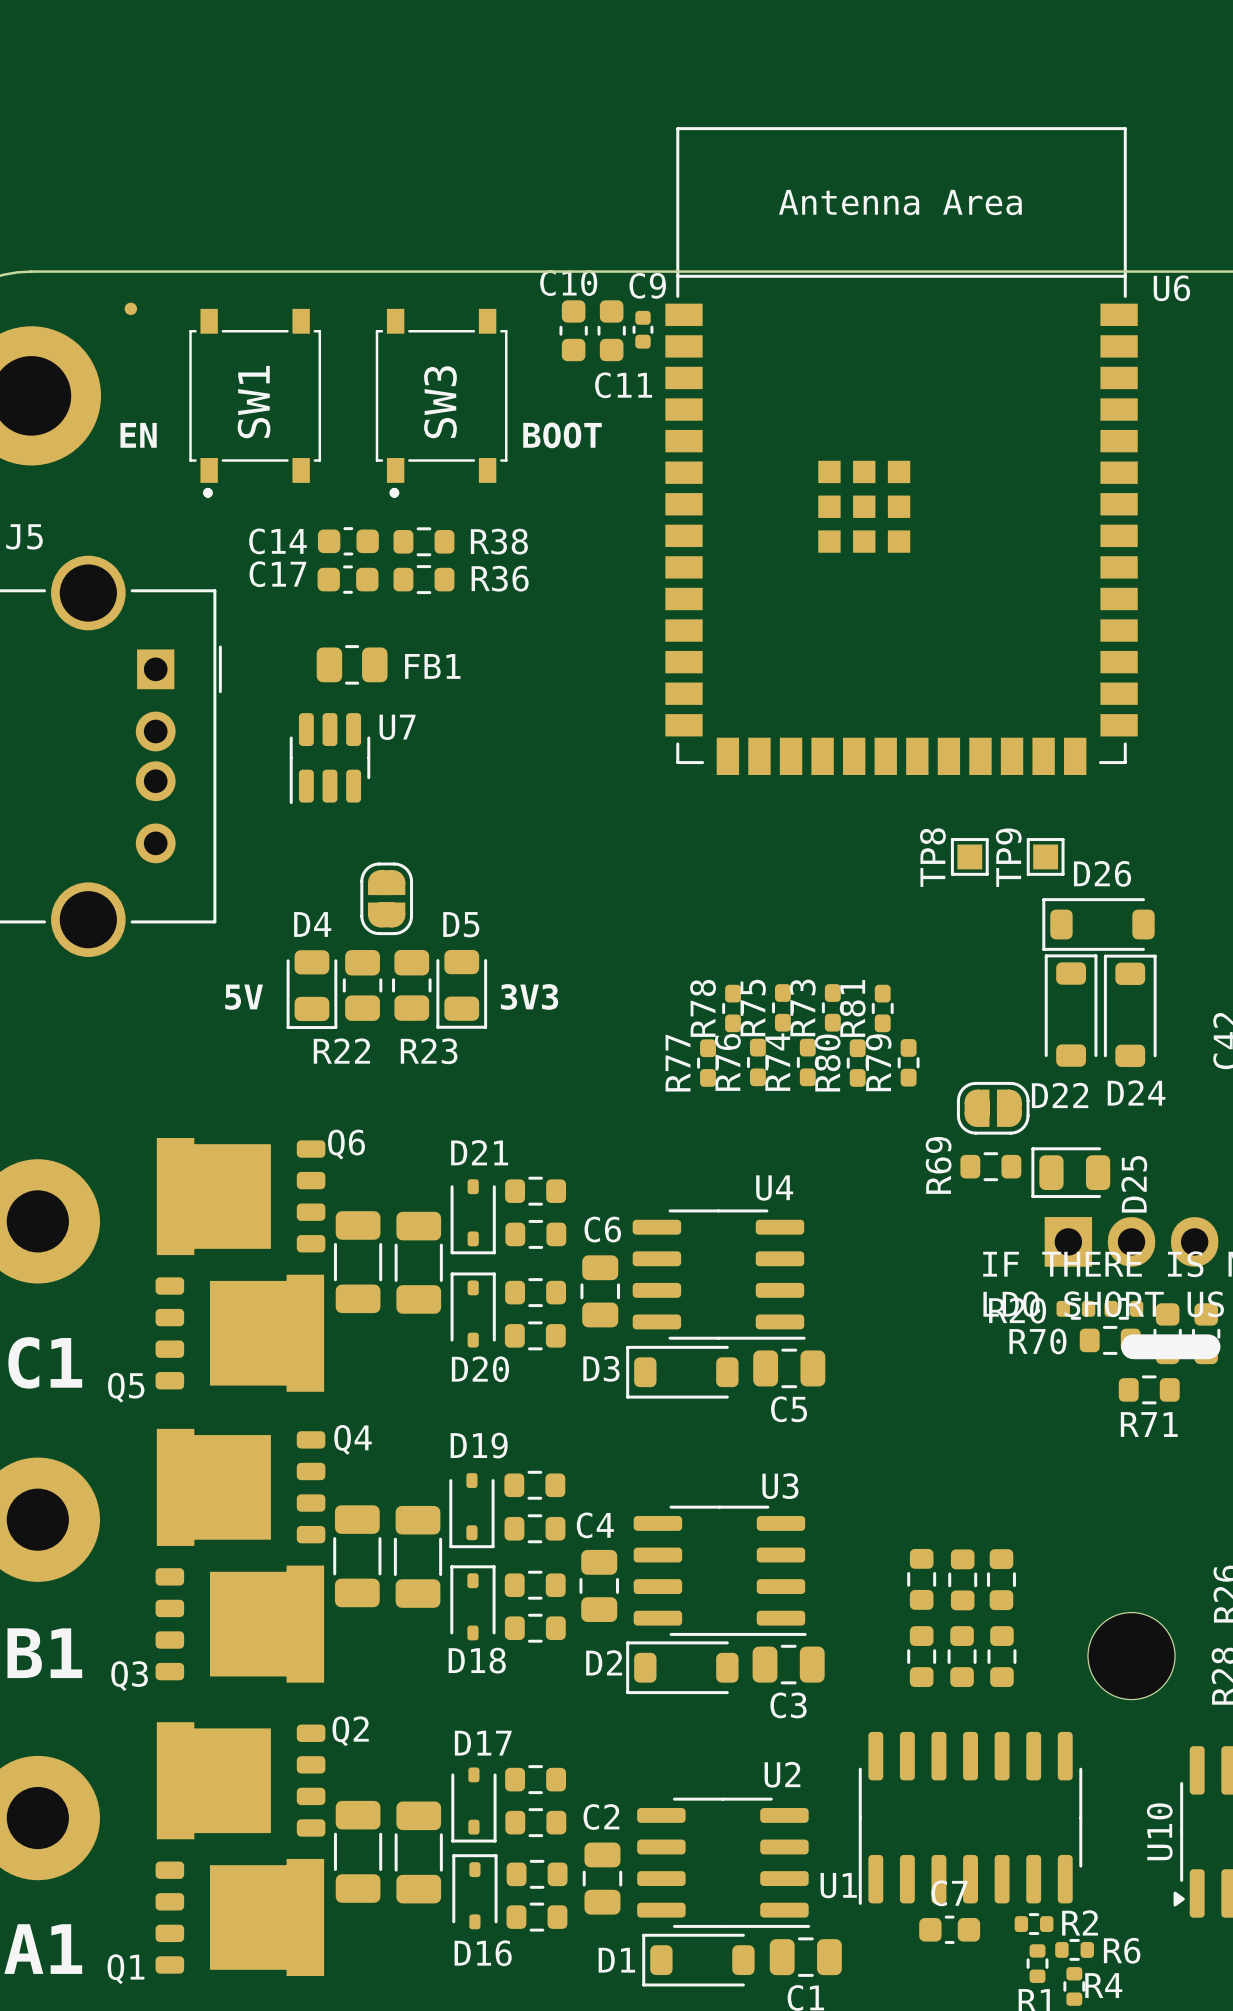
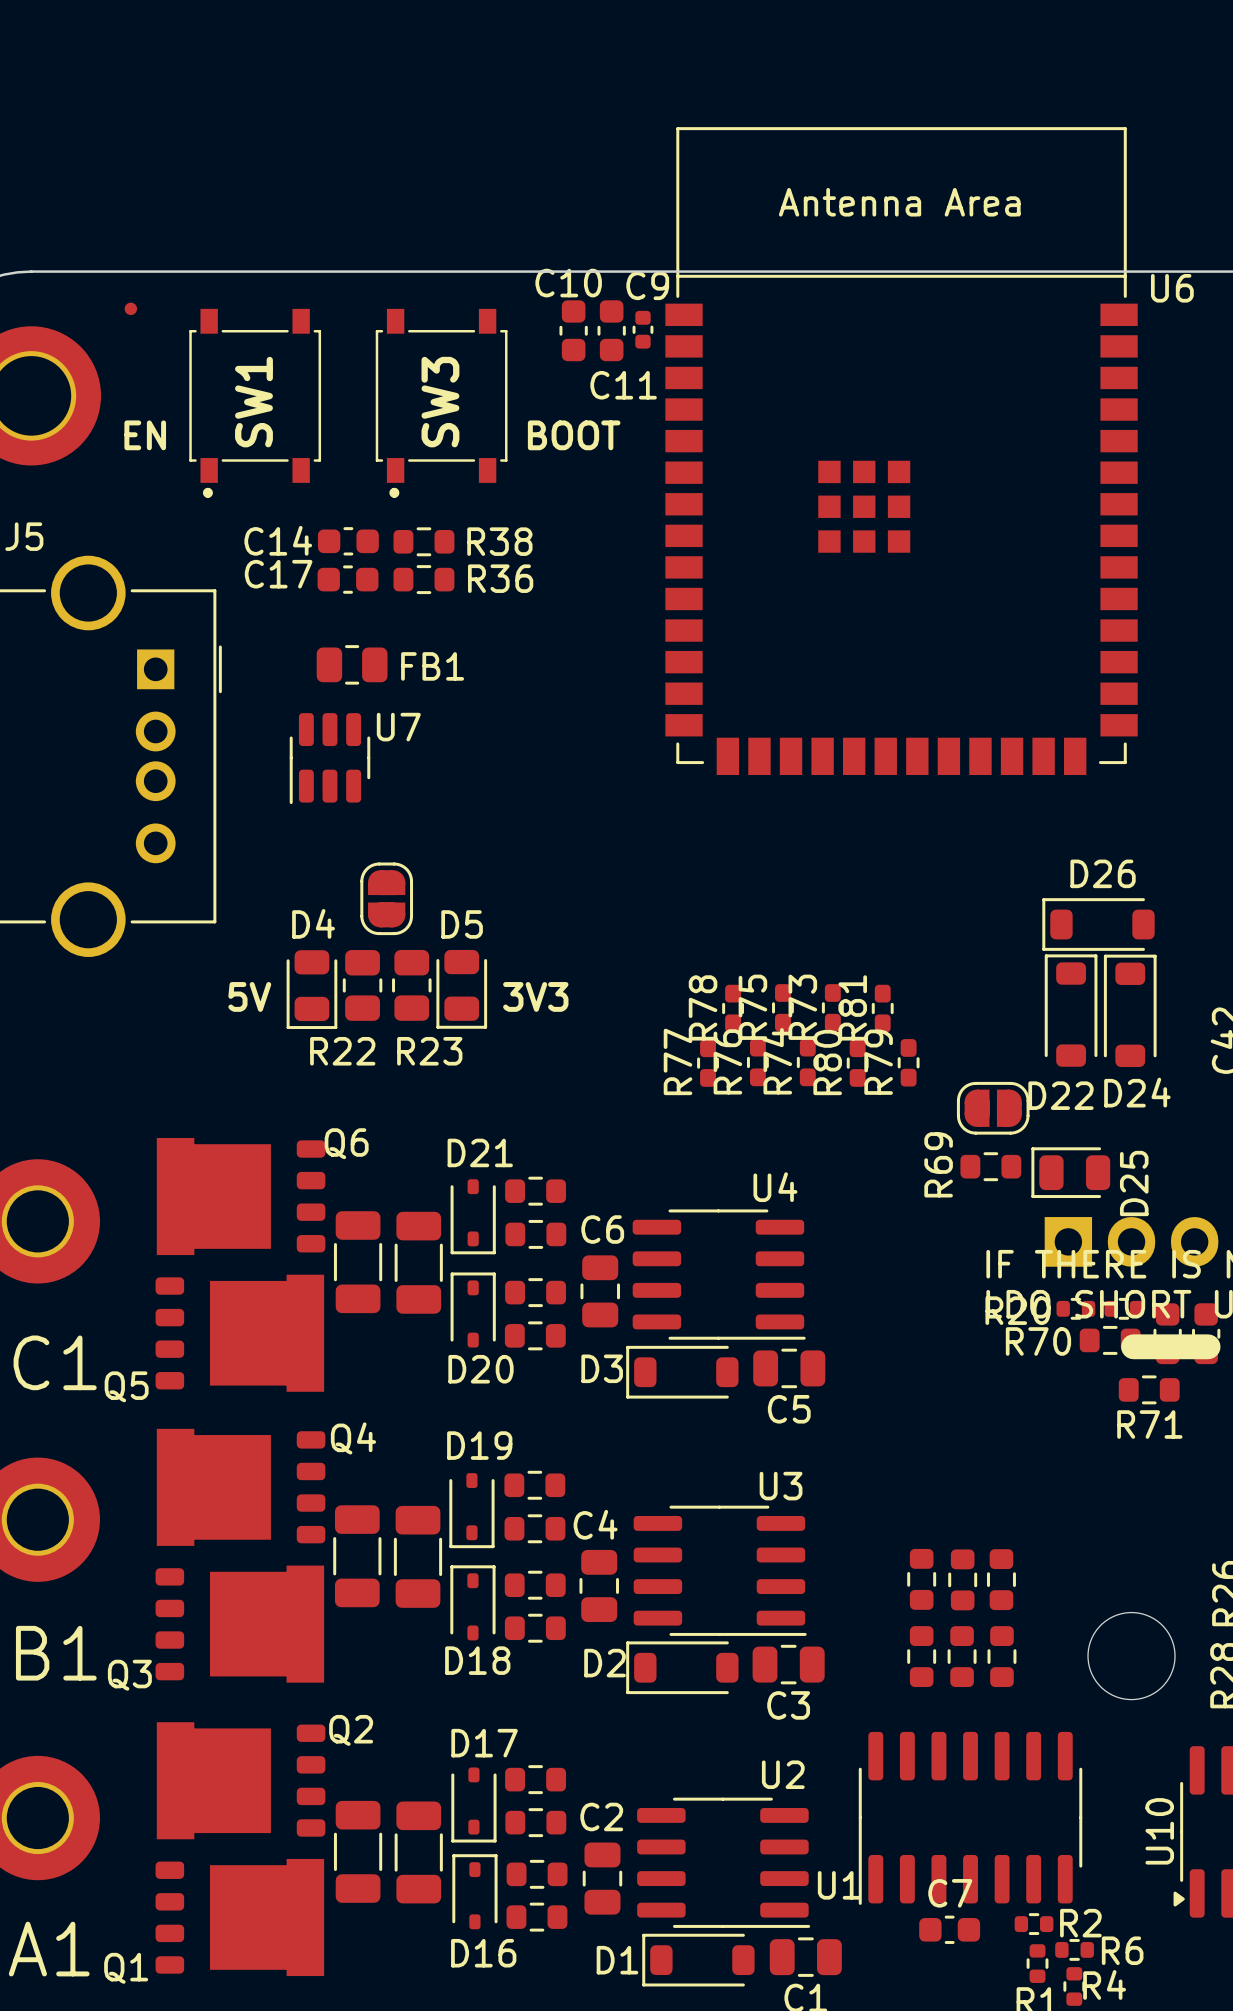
TP8: (969, 856) -> none
TP9: (1045, 856) -> none

